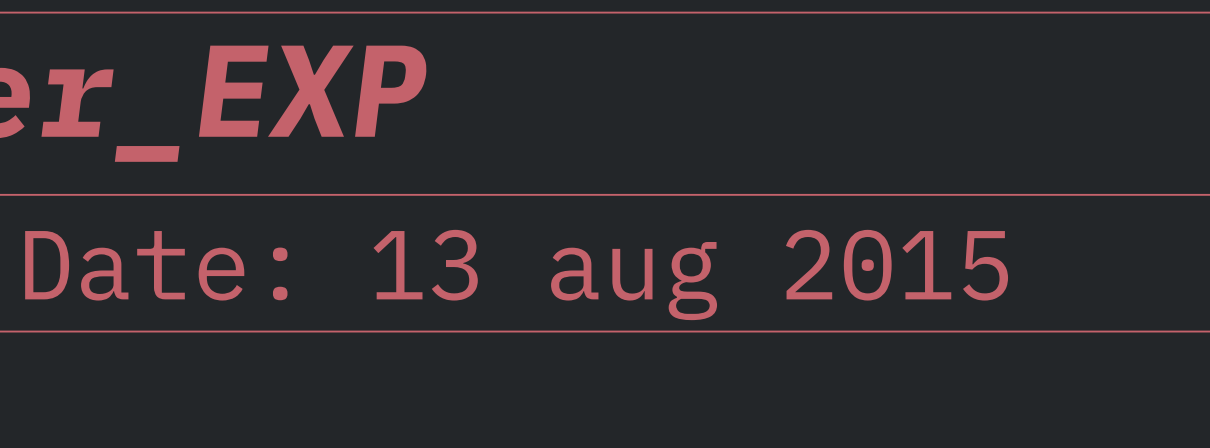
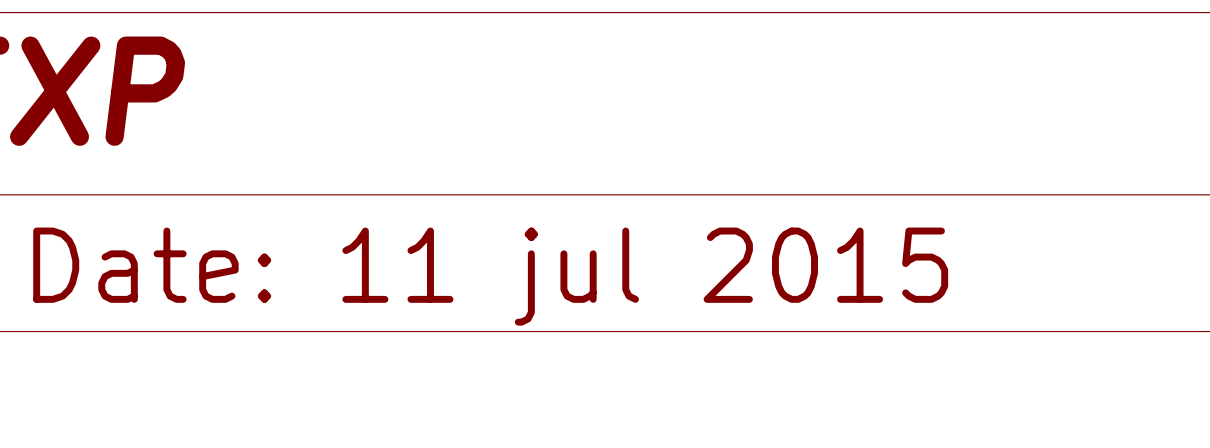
title block: Date: 13 aug 2015 (516, 274) -> Date: 11 jul 2015 (490, 276)

